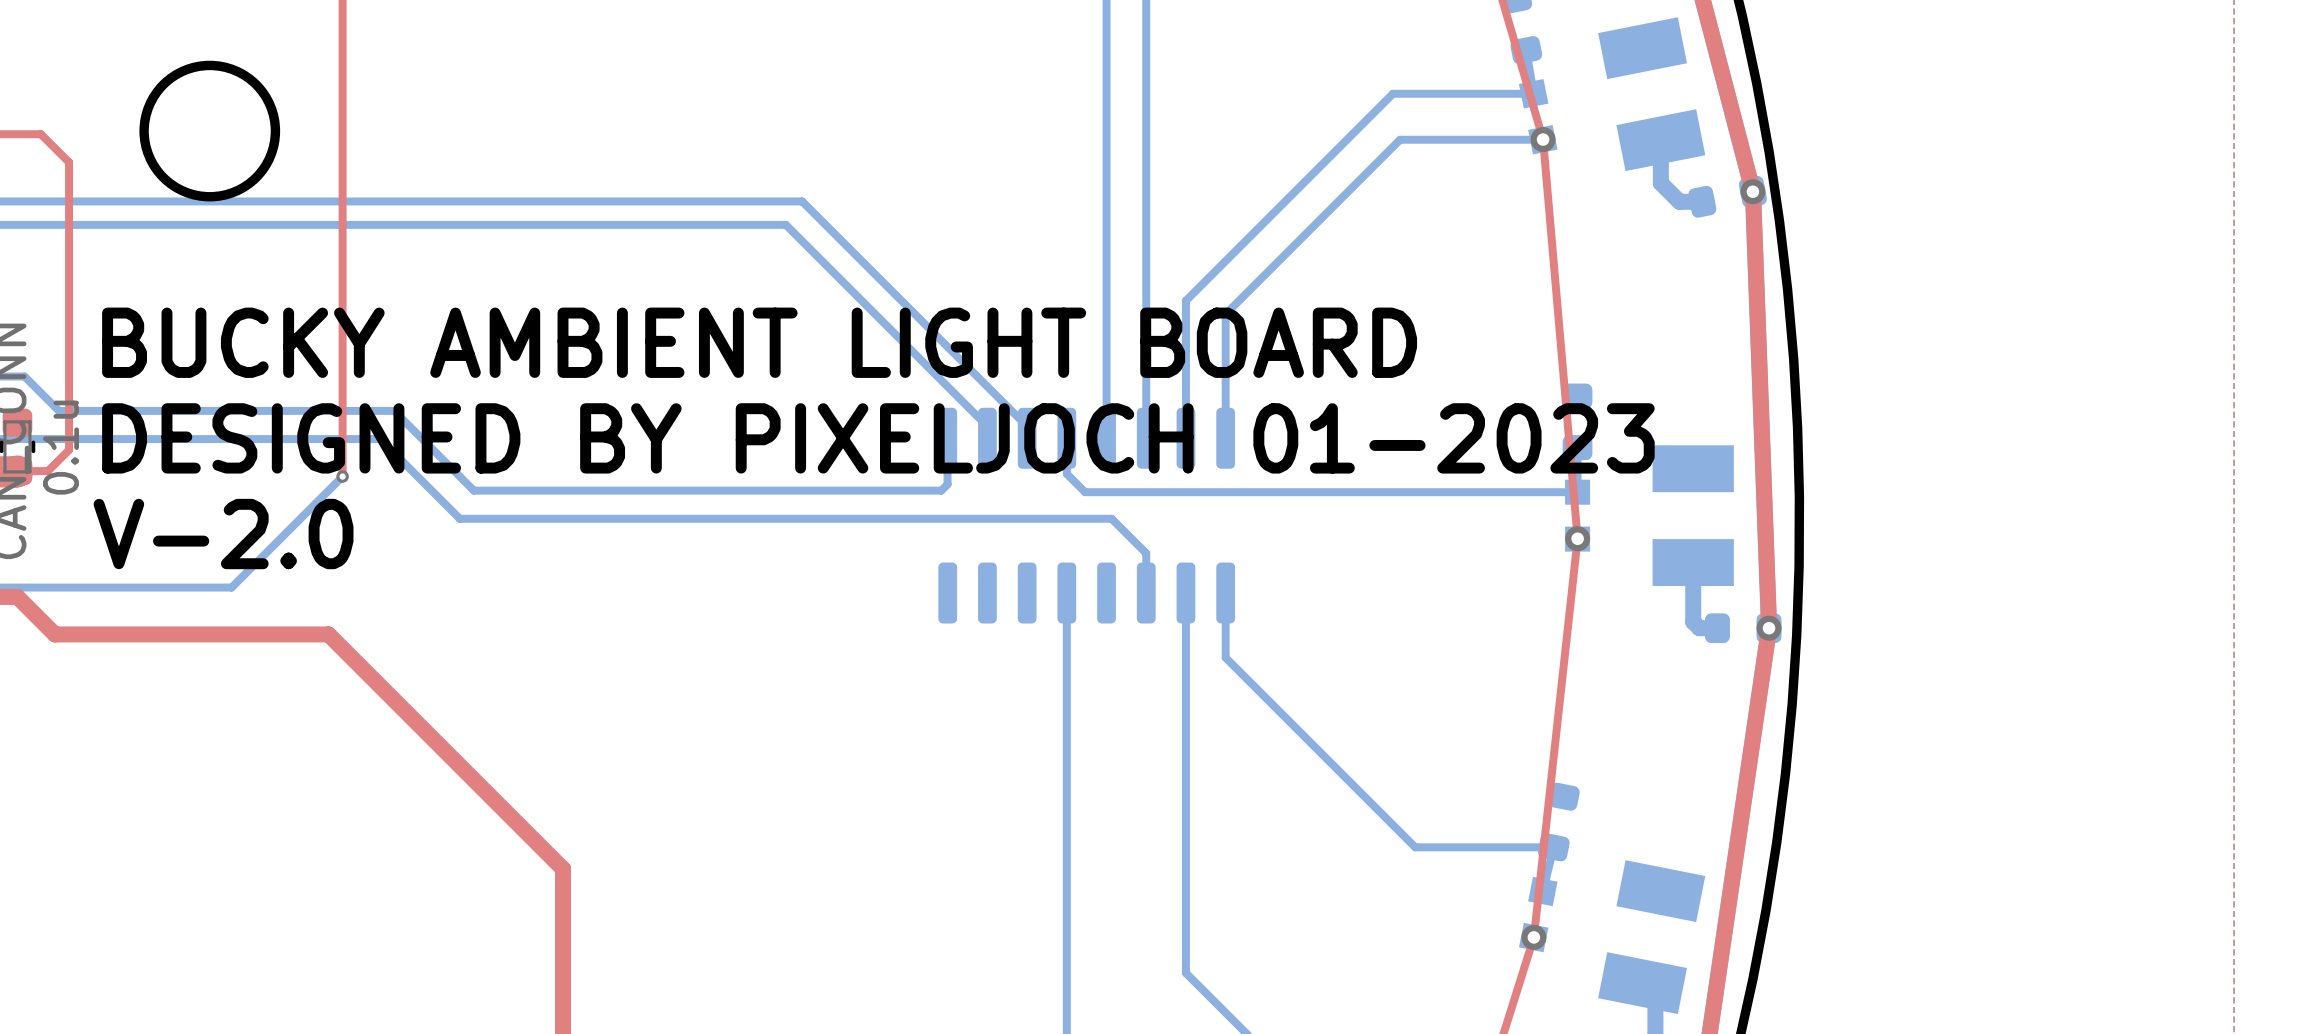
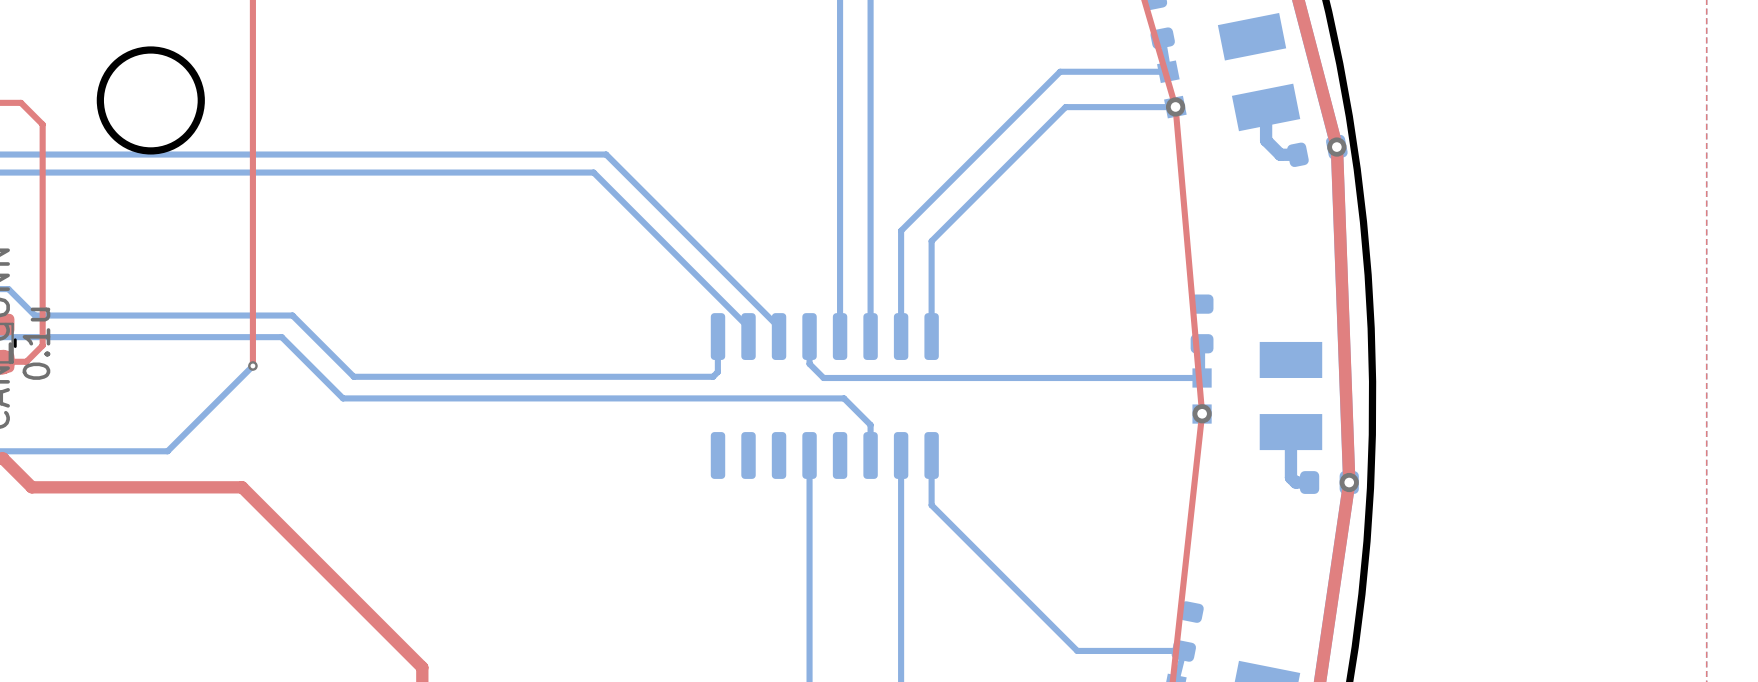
text: BUCKY AMBIENT LIGHT BOARD (759, 342) -> none
text: DESIGNED BY PIXELJOCH 01-2023 (878, 438) -> none
text: V-2.0 (223, 534) -> none

